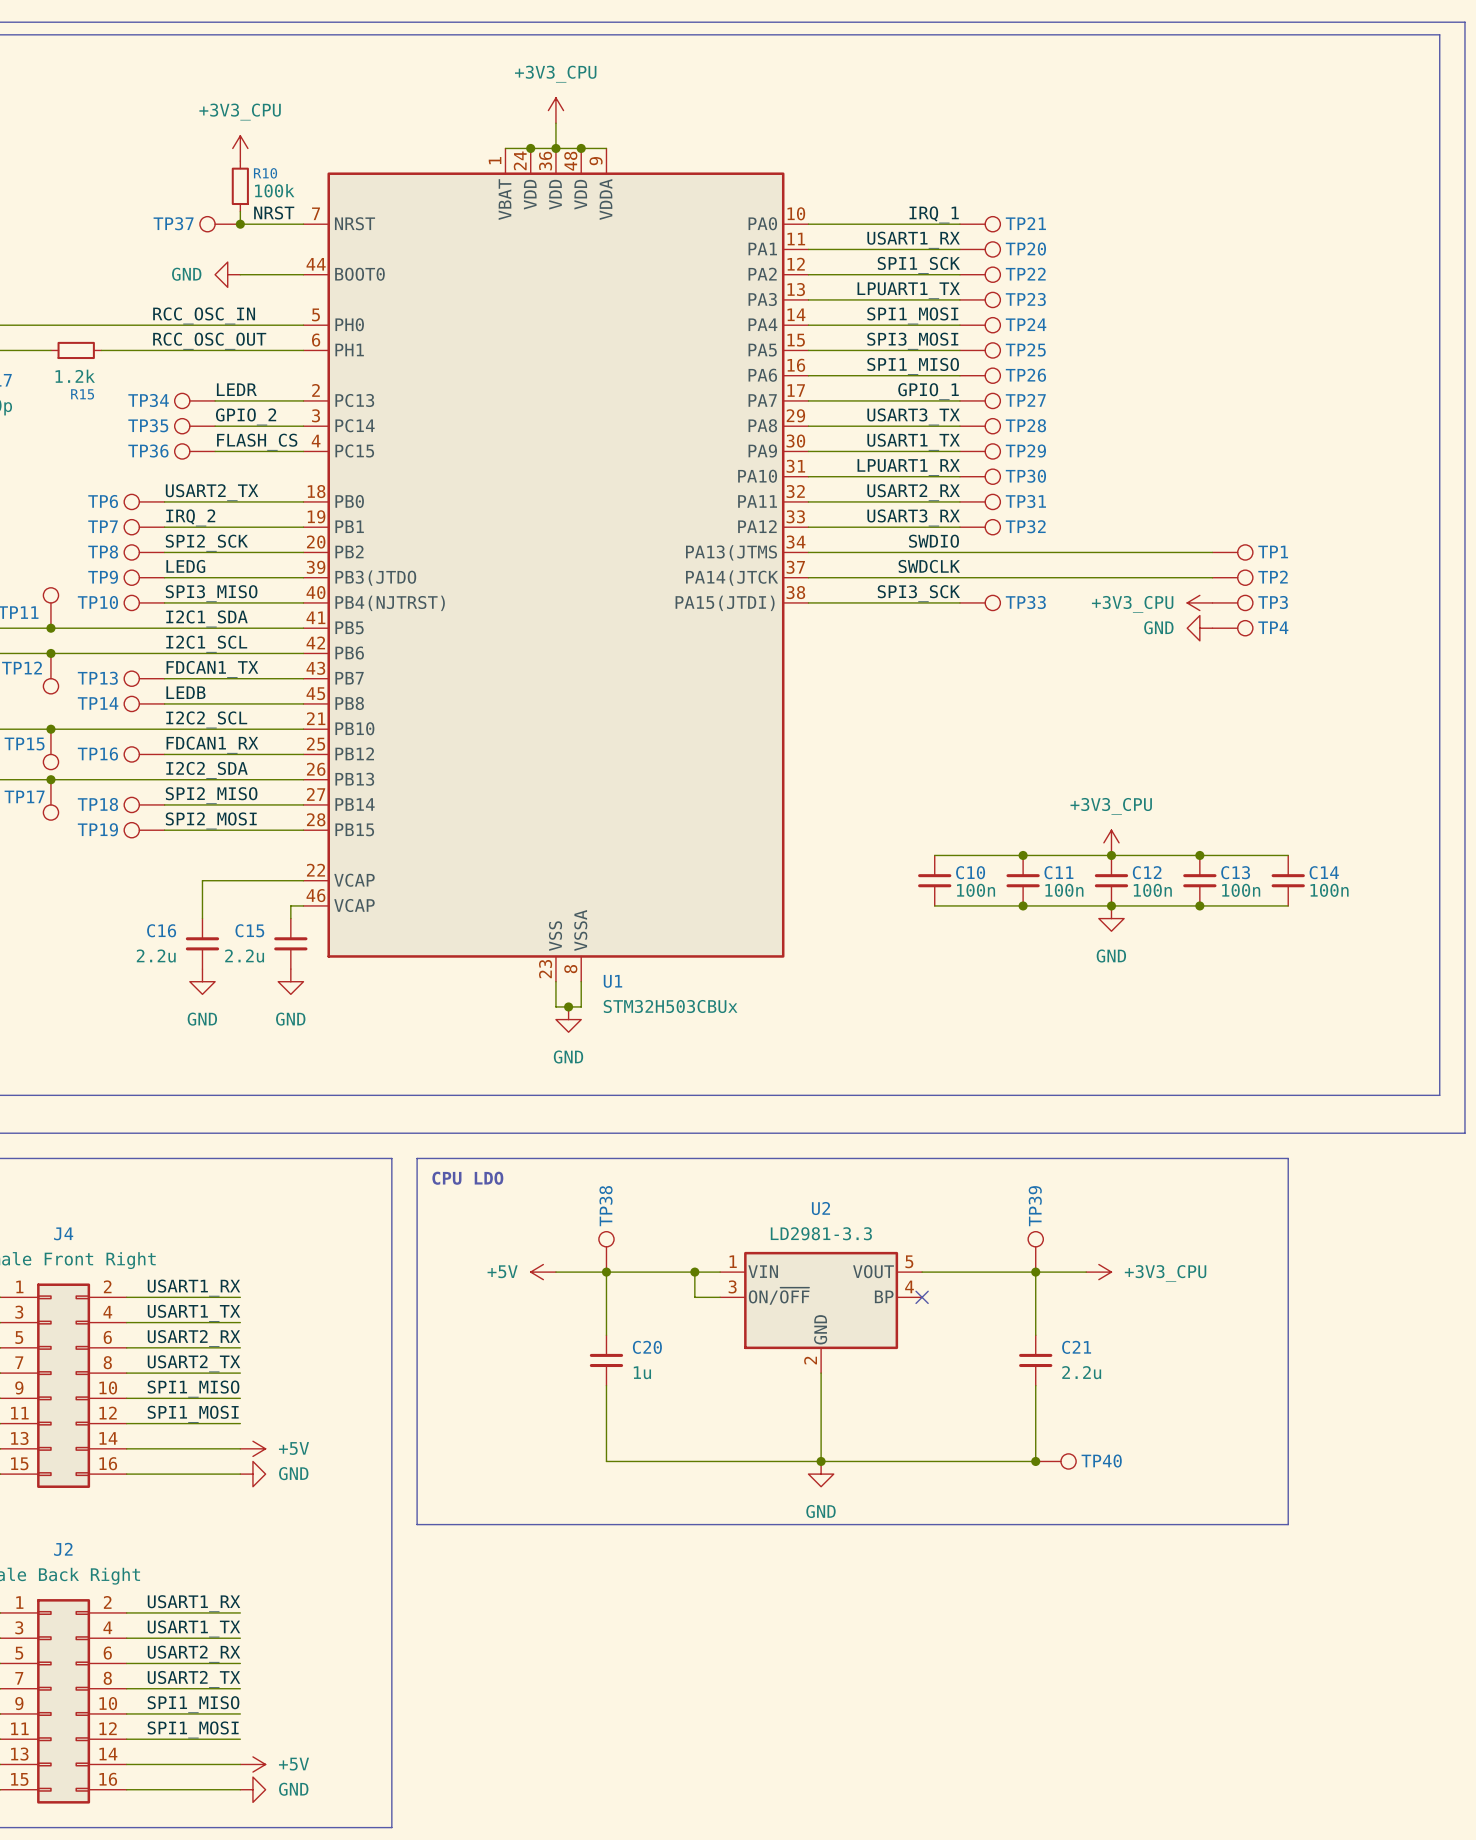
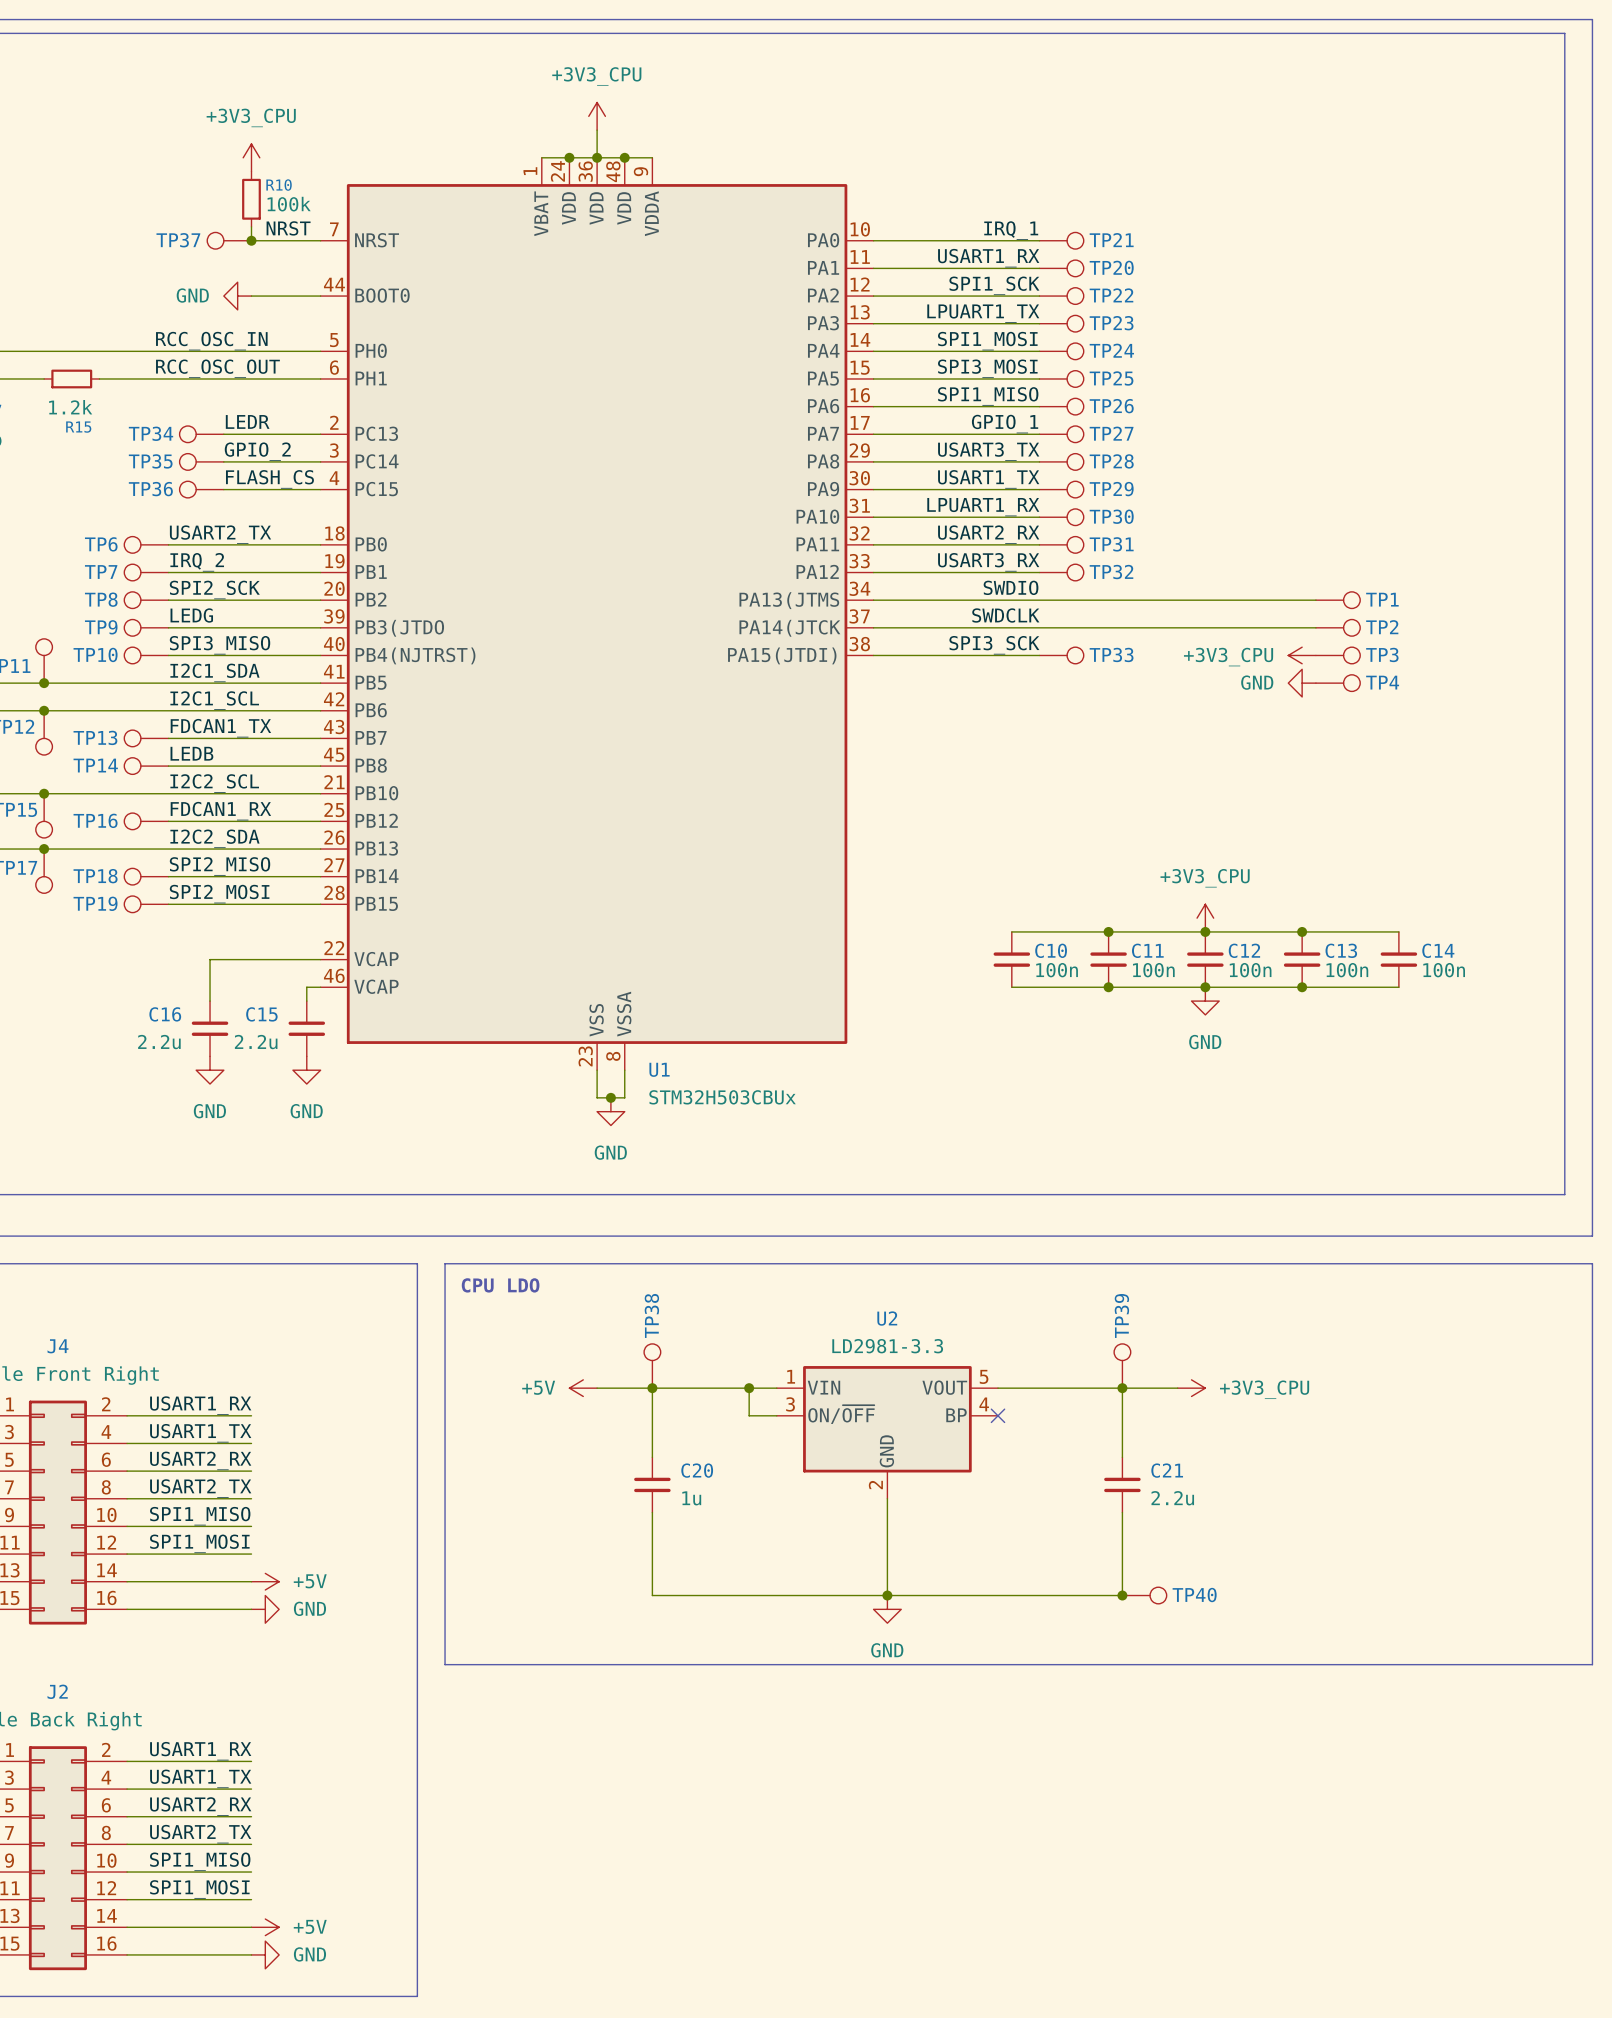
line: (1288, 1158) (1288, 1524) -> (1398, 1263) (1592, 1263) (1592, 1664) (1398, 1664)

